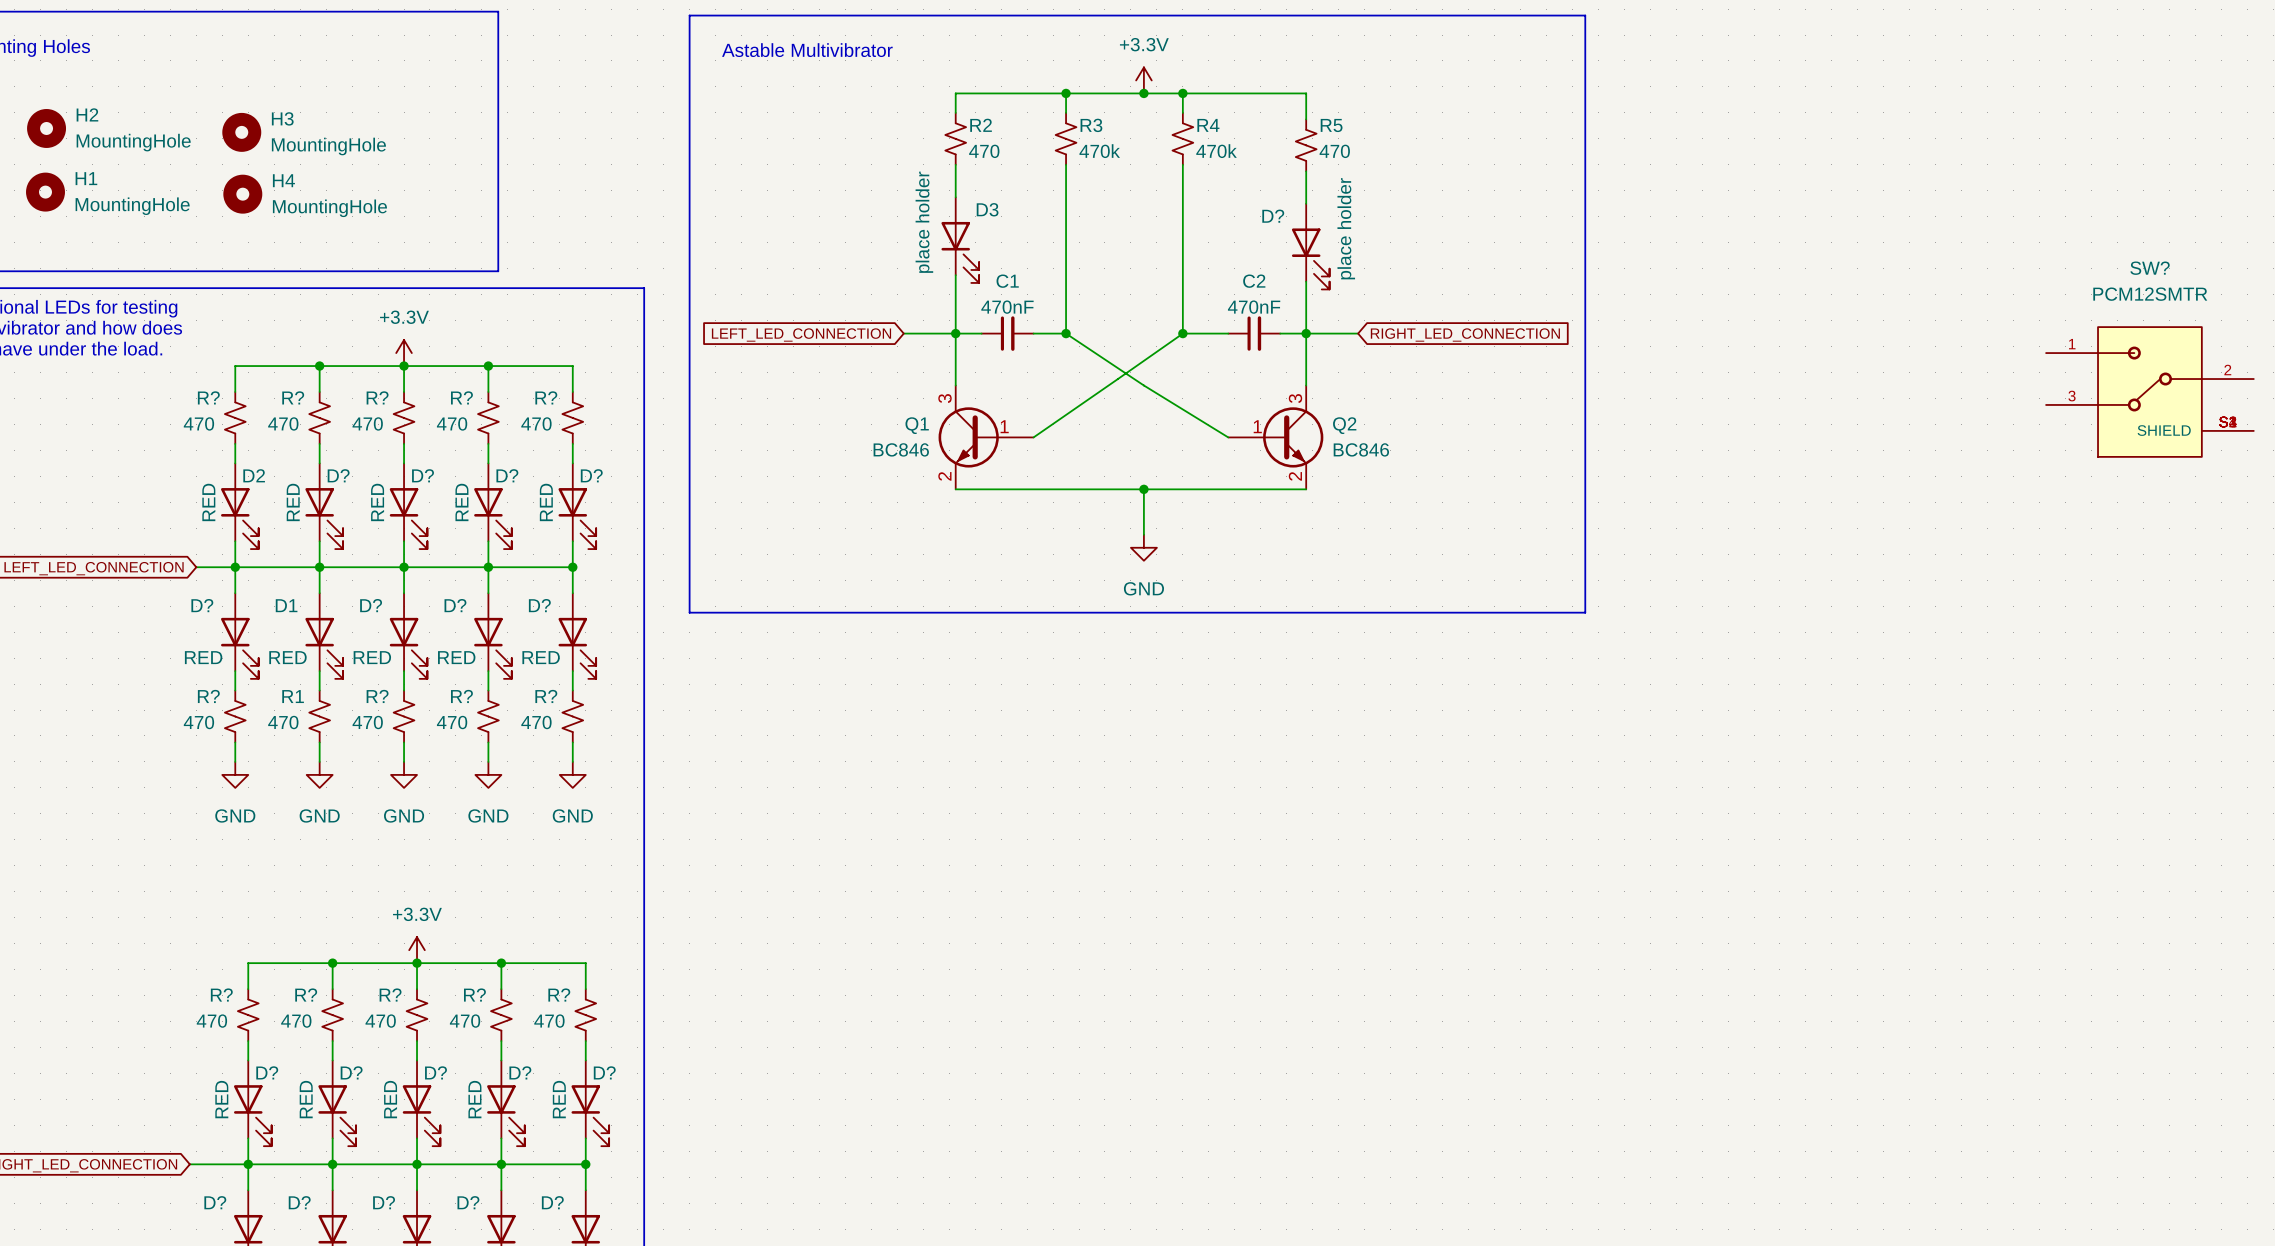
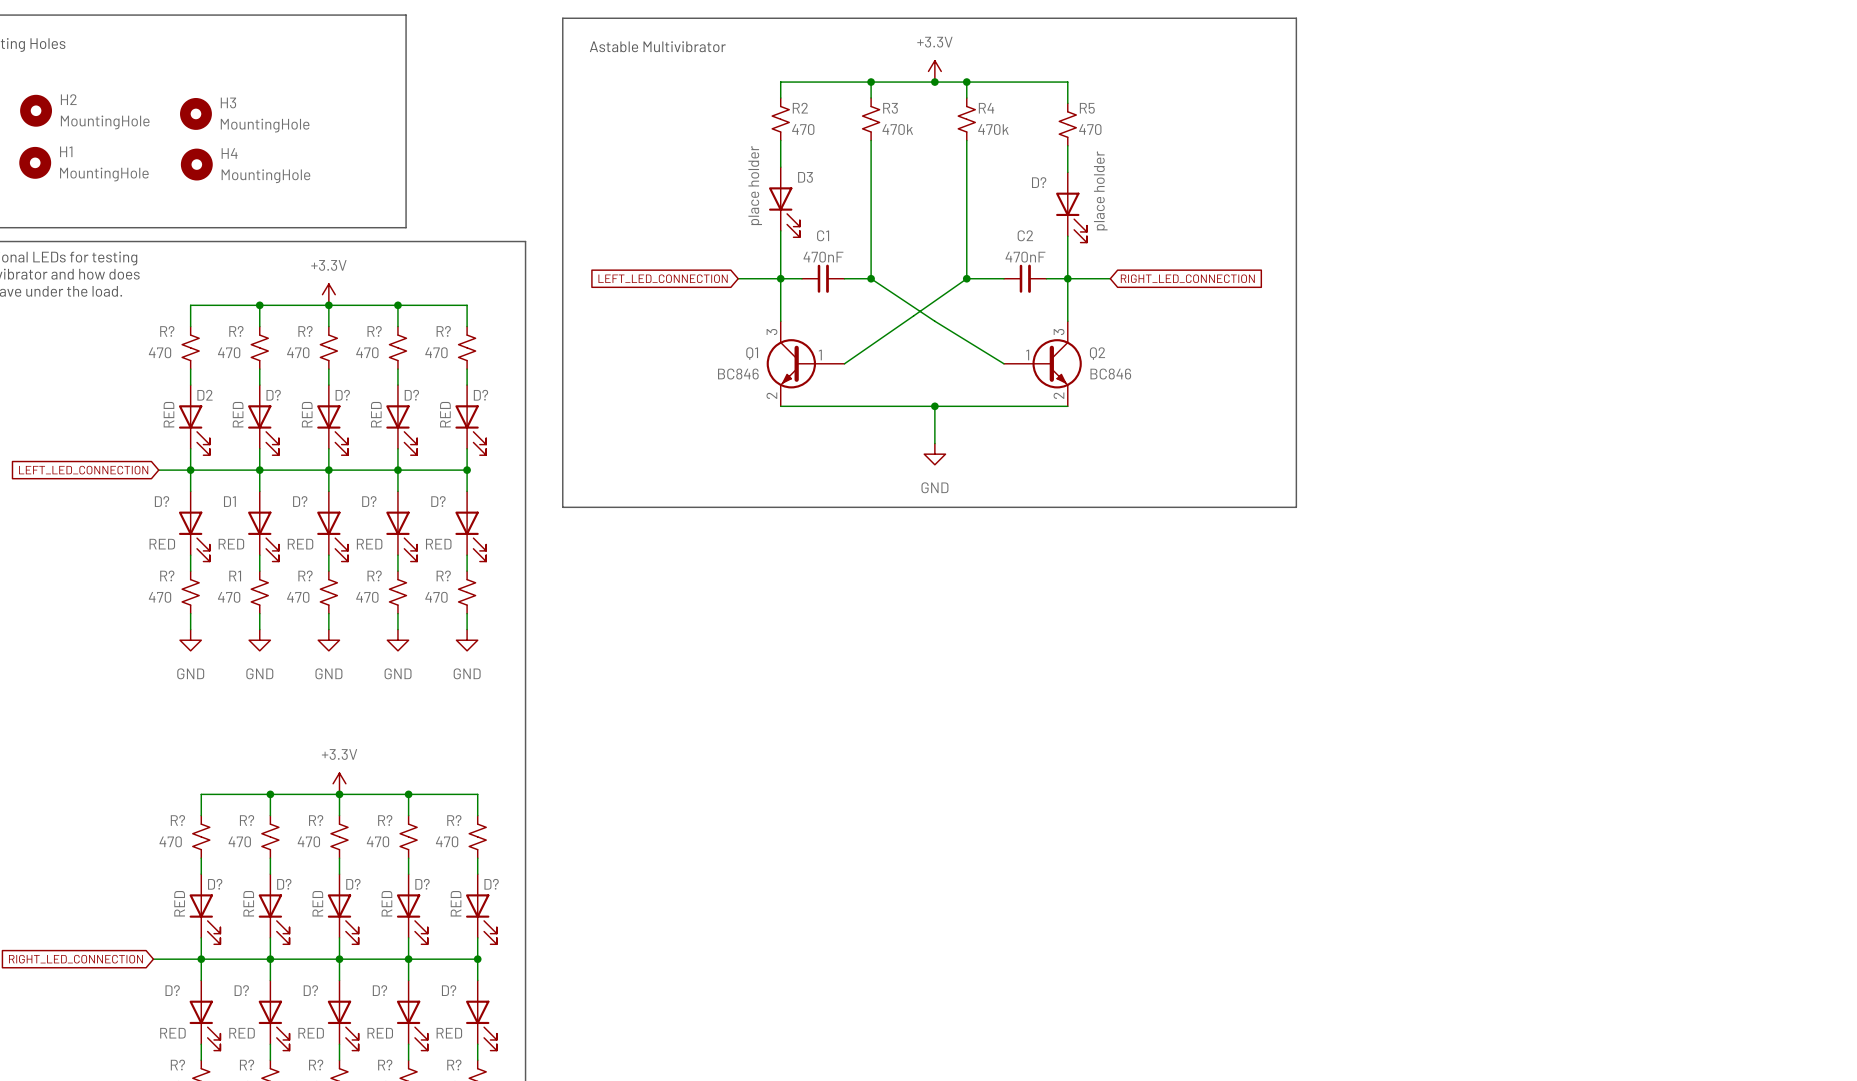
SW?: PCM12SMTR (2149, 391) -> none

